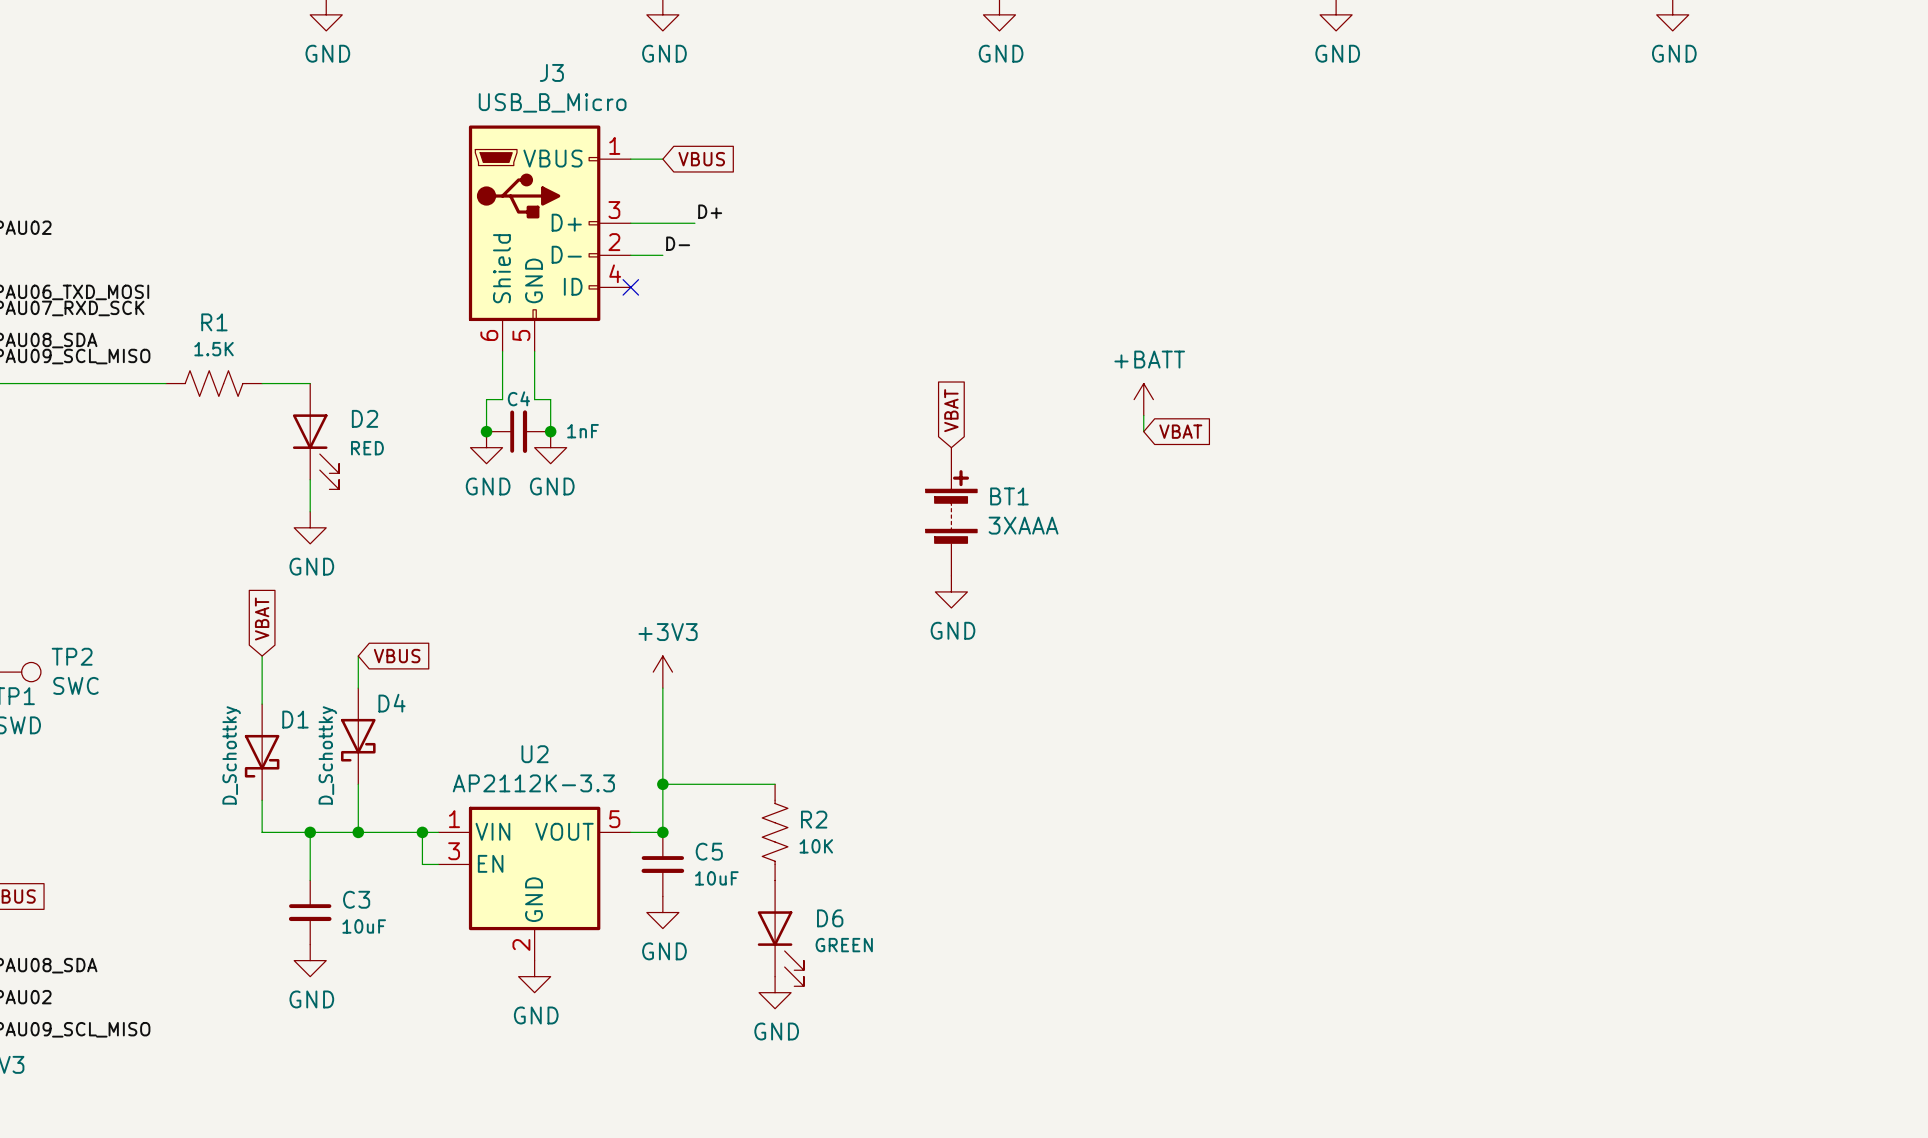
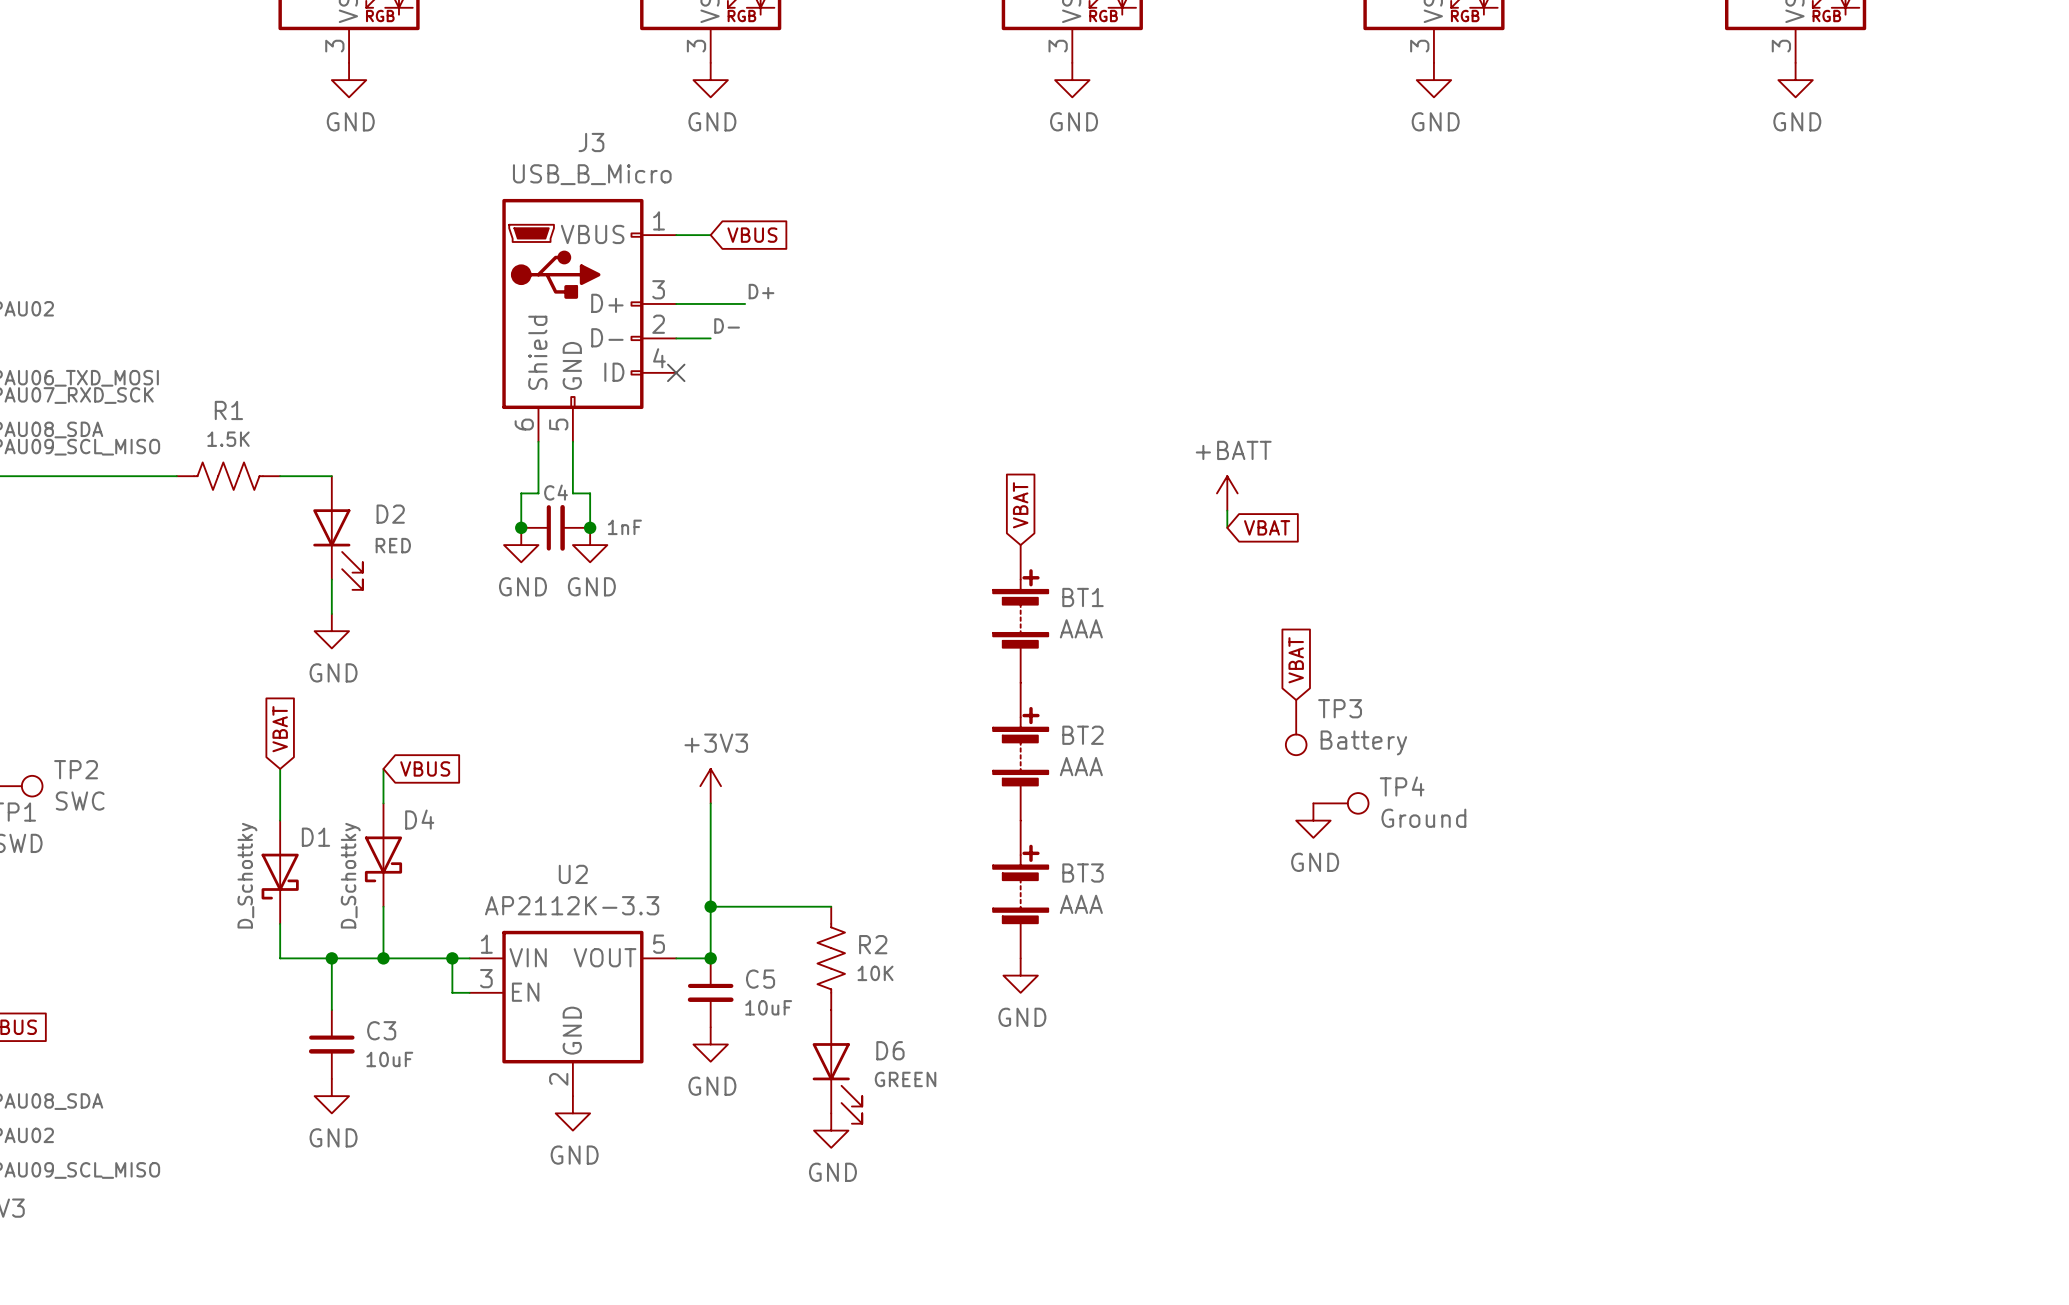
BT1 value: 3XAAA (1023, 525) -> AAA (1081, 628)
global label: none -> VBAT (1296, 660)
power symbol: GND (951, 591) -> none
TP3: none -> Battery (1296, 727)
BT2: none -> AAA (1020, 751)
TP4: none -> Ground (1340, 803)
power symbol: none -> GND (1313, 820)
BT3: none -> AAA (1020, 889)
power symbol: none -> GND (1020, 975)

